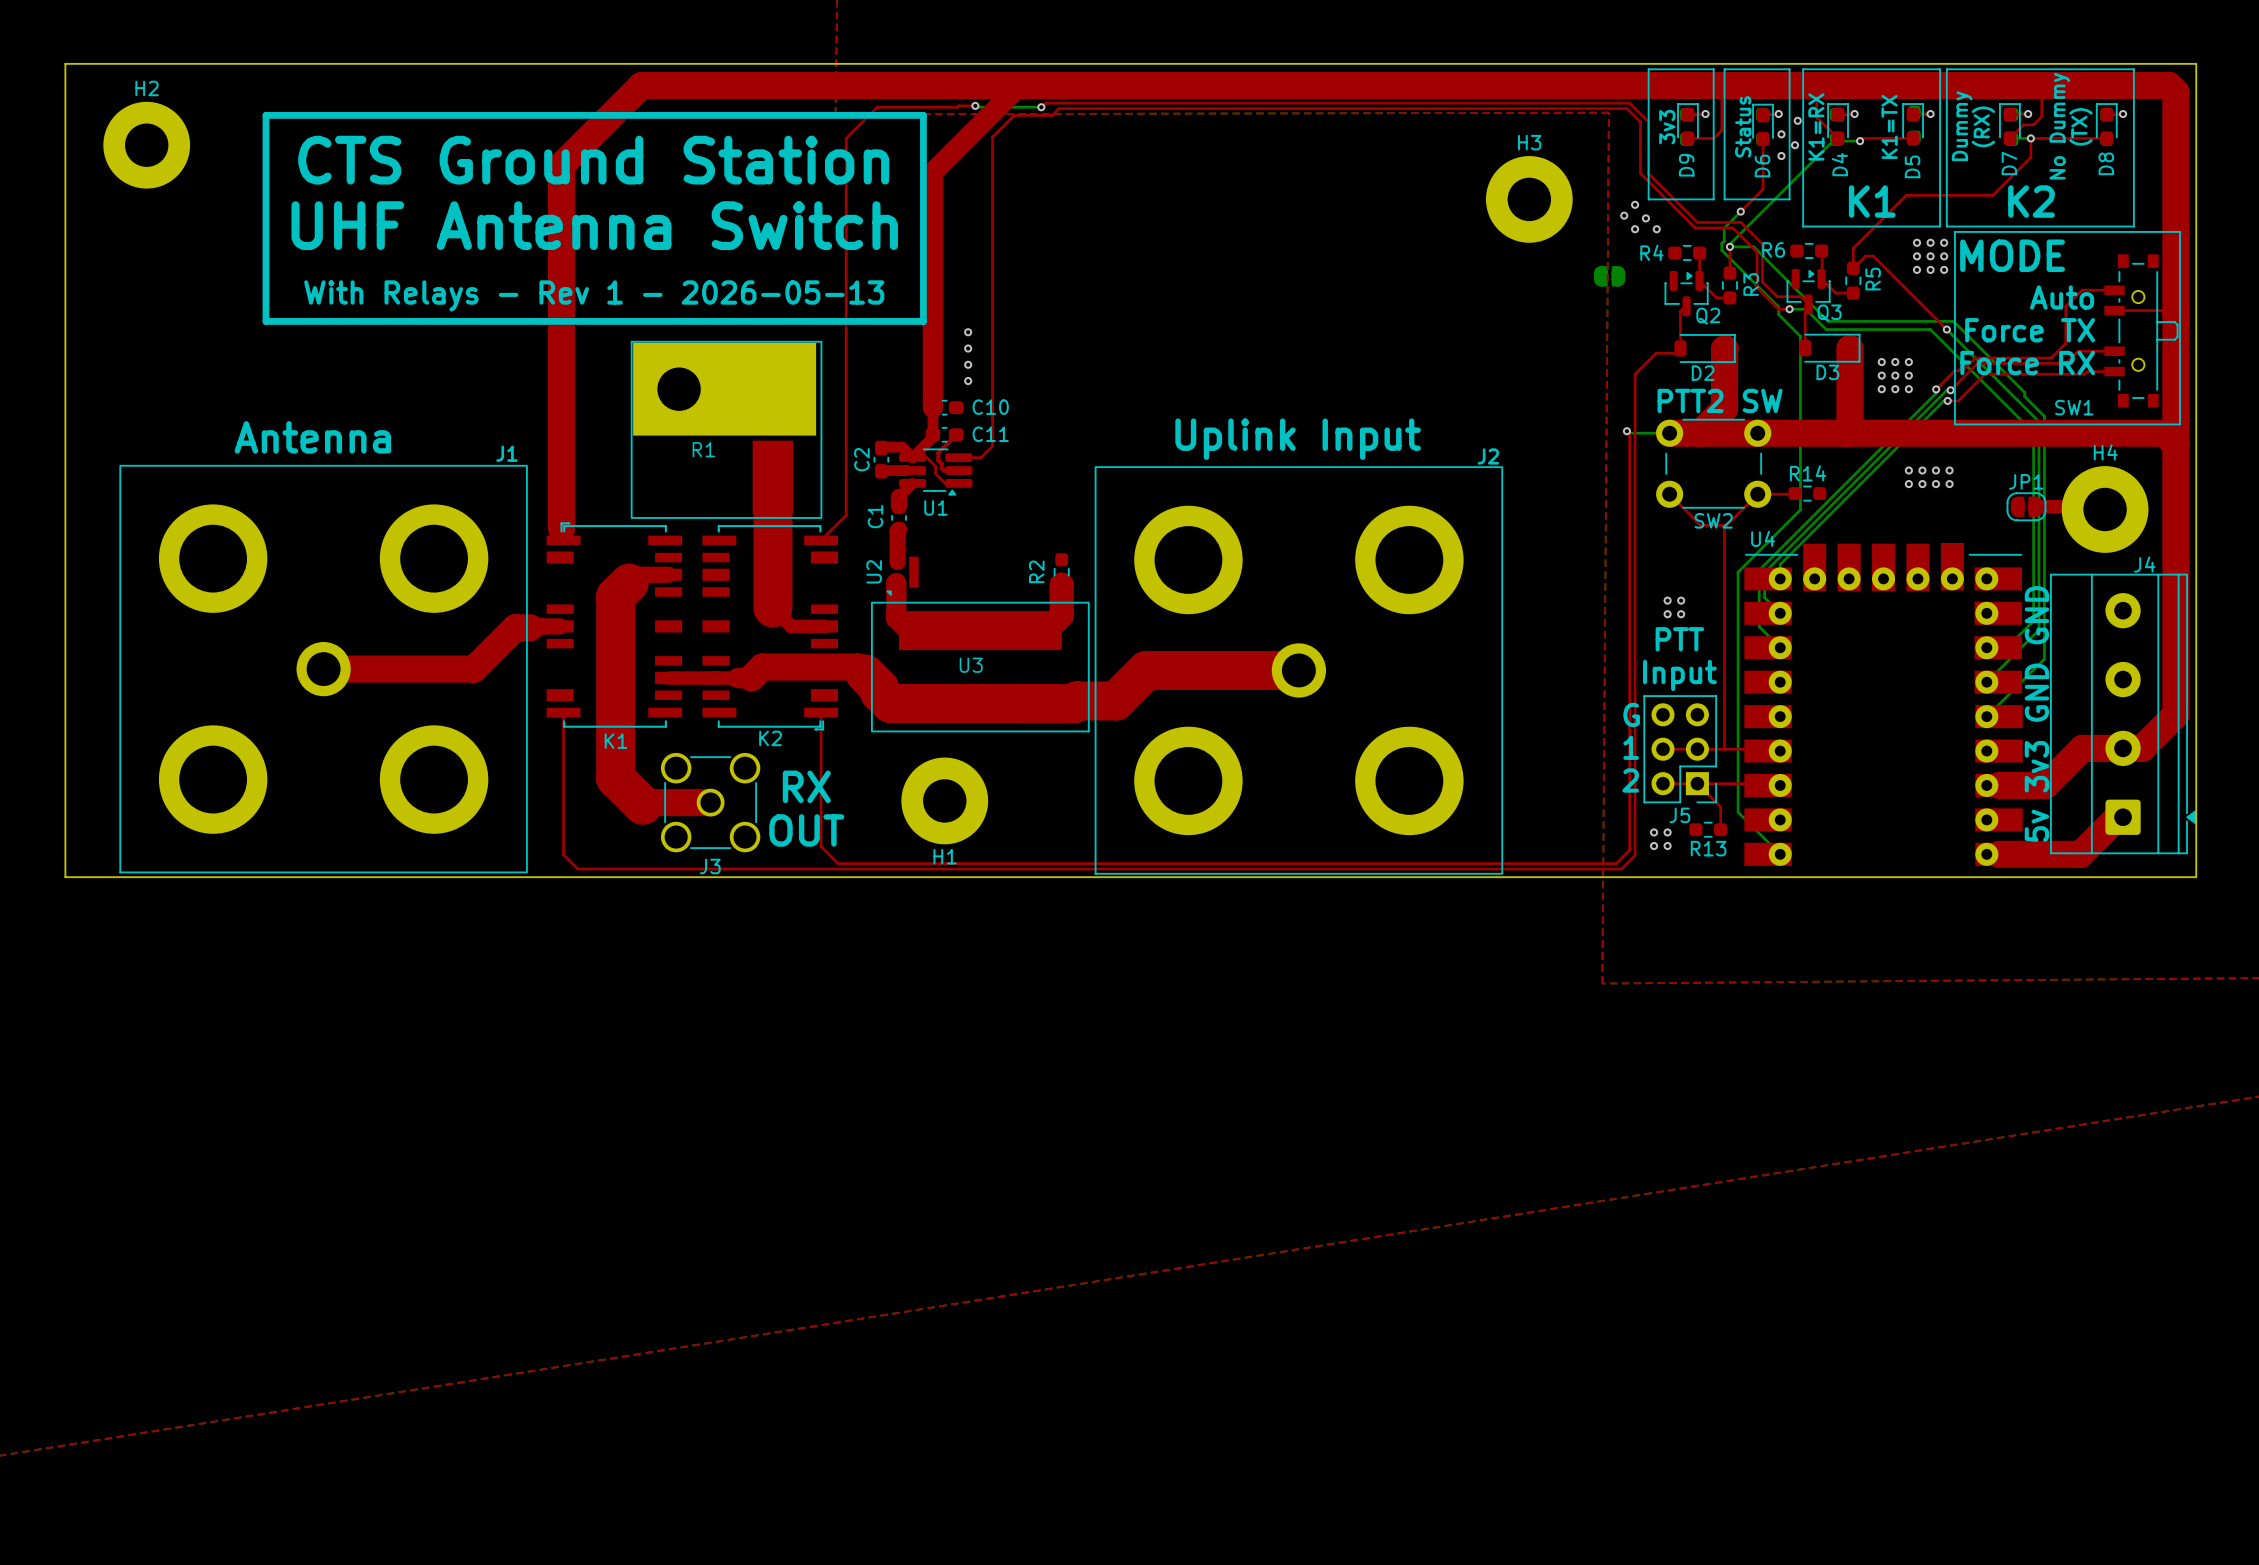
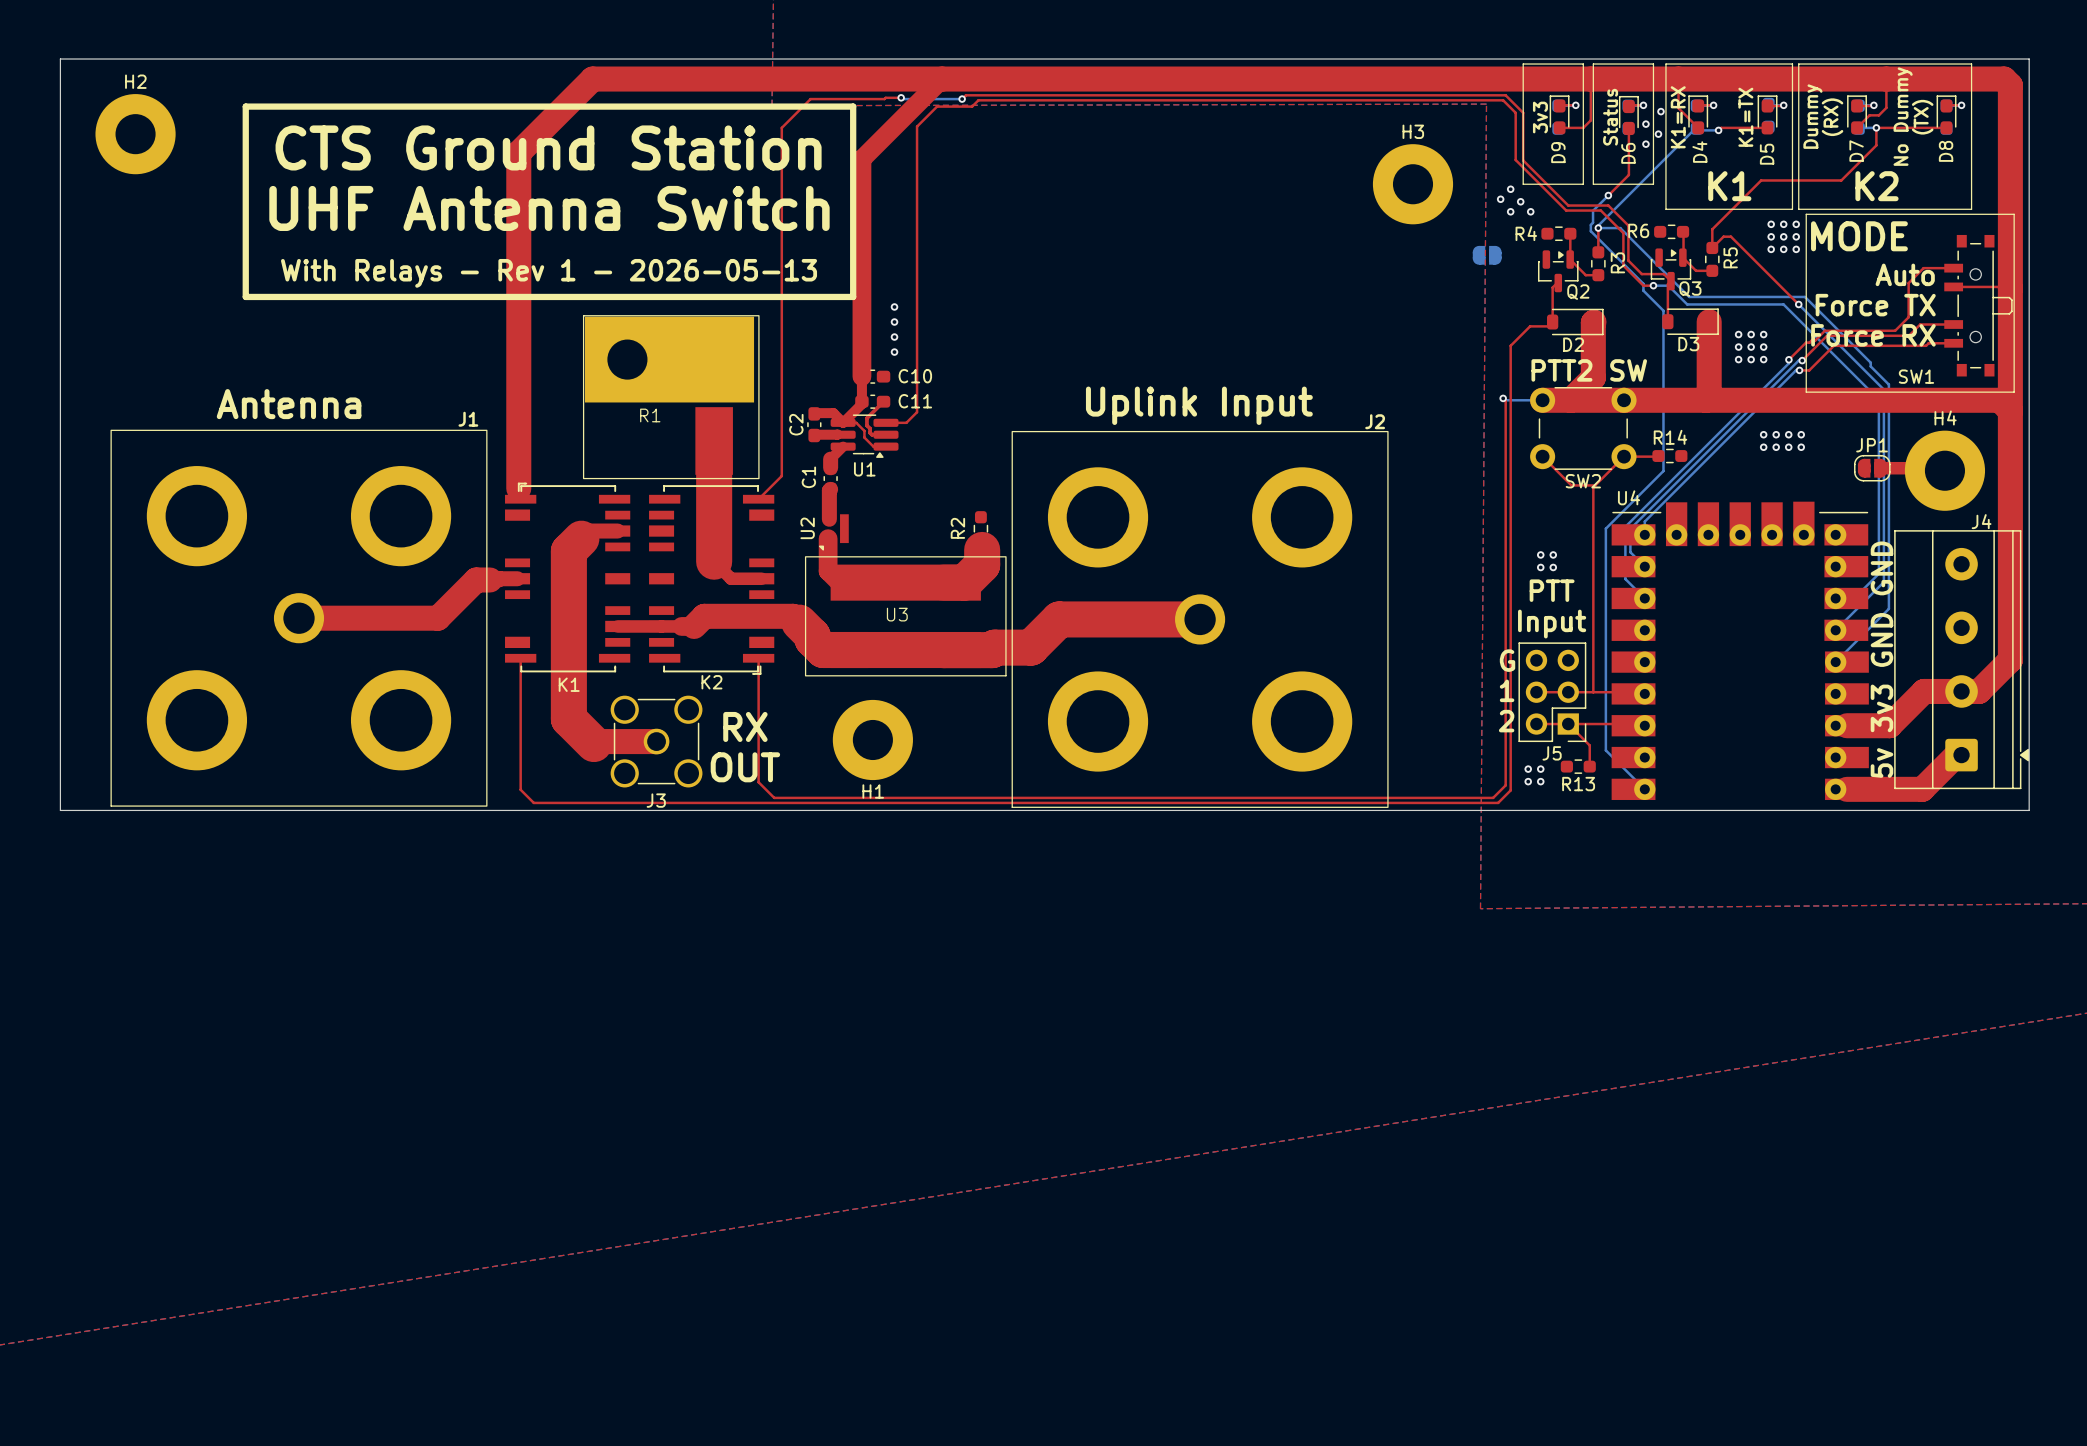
top track: (1061, 584) (1061, 615) (1046, 630) -> none
top track: none -> (982, 549) (982, 564) (964, 582) (943, 582)

